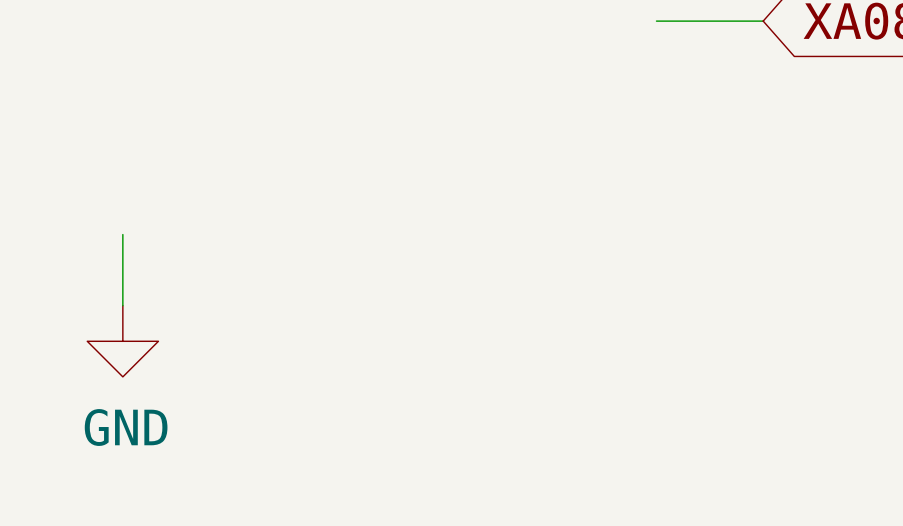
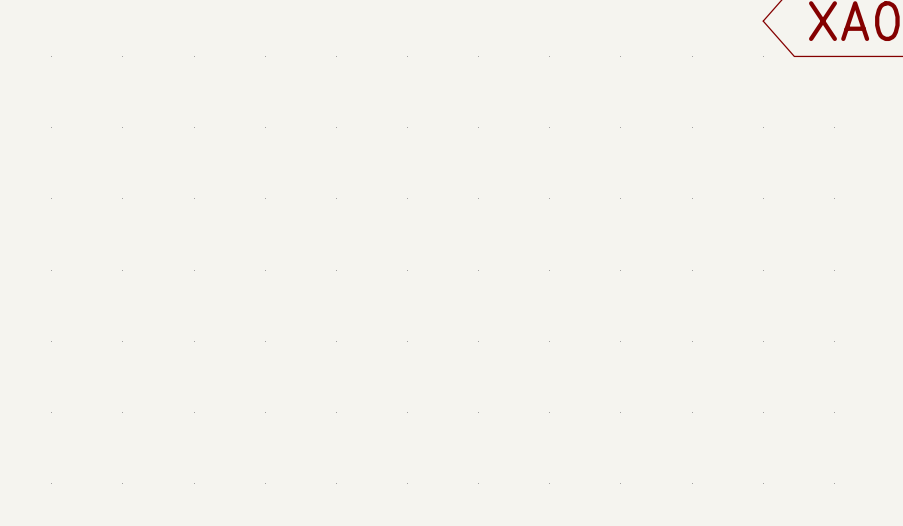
wire: (656, 21) (763, 21) -> none
wire: (122, 234) (122, 305) -> none
power symbol: GND (122, 341) -> none

